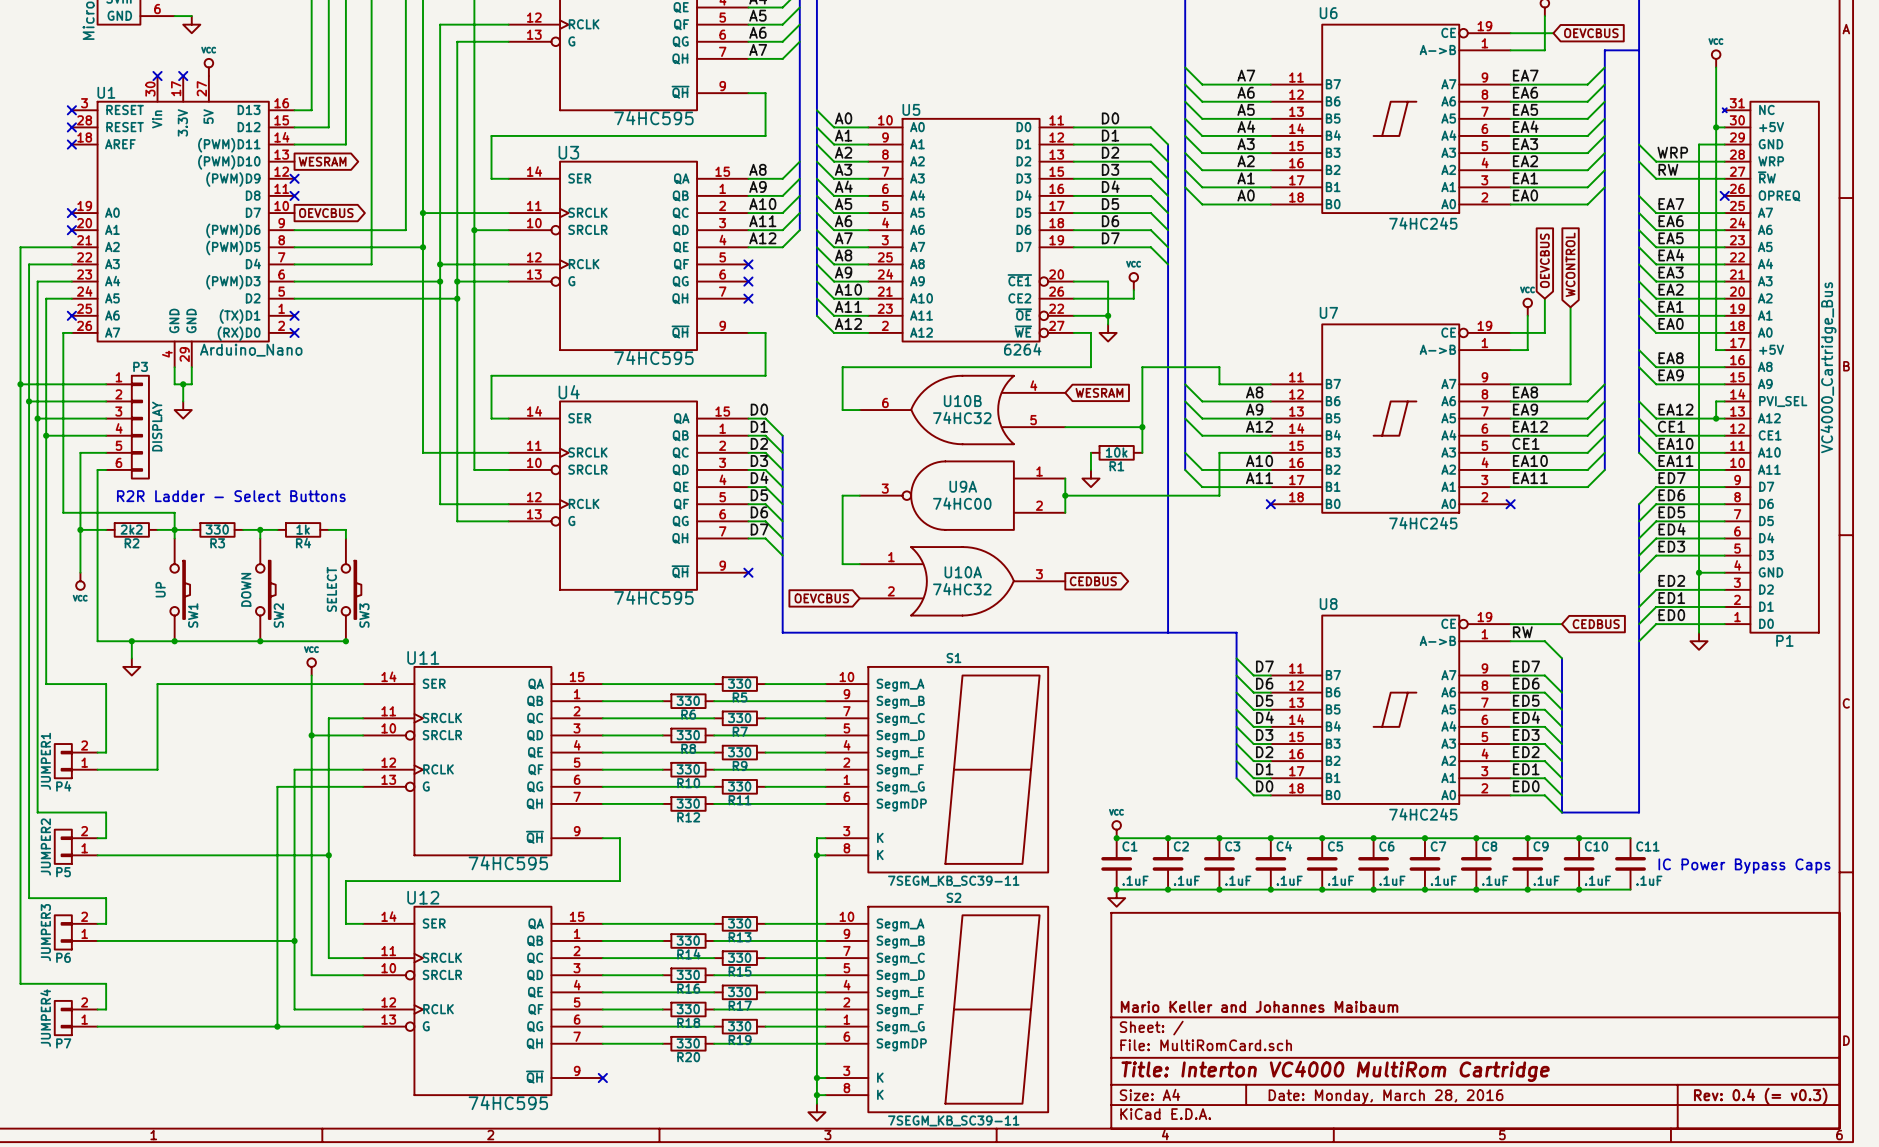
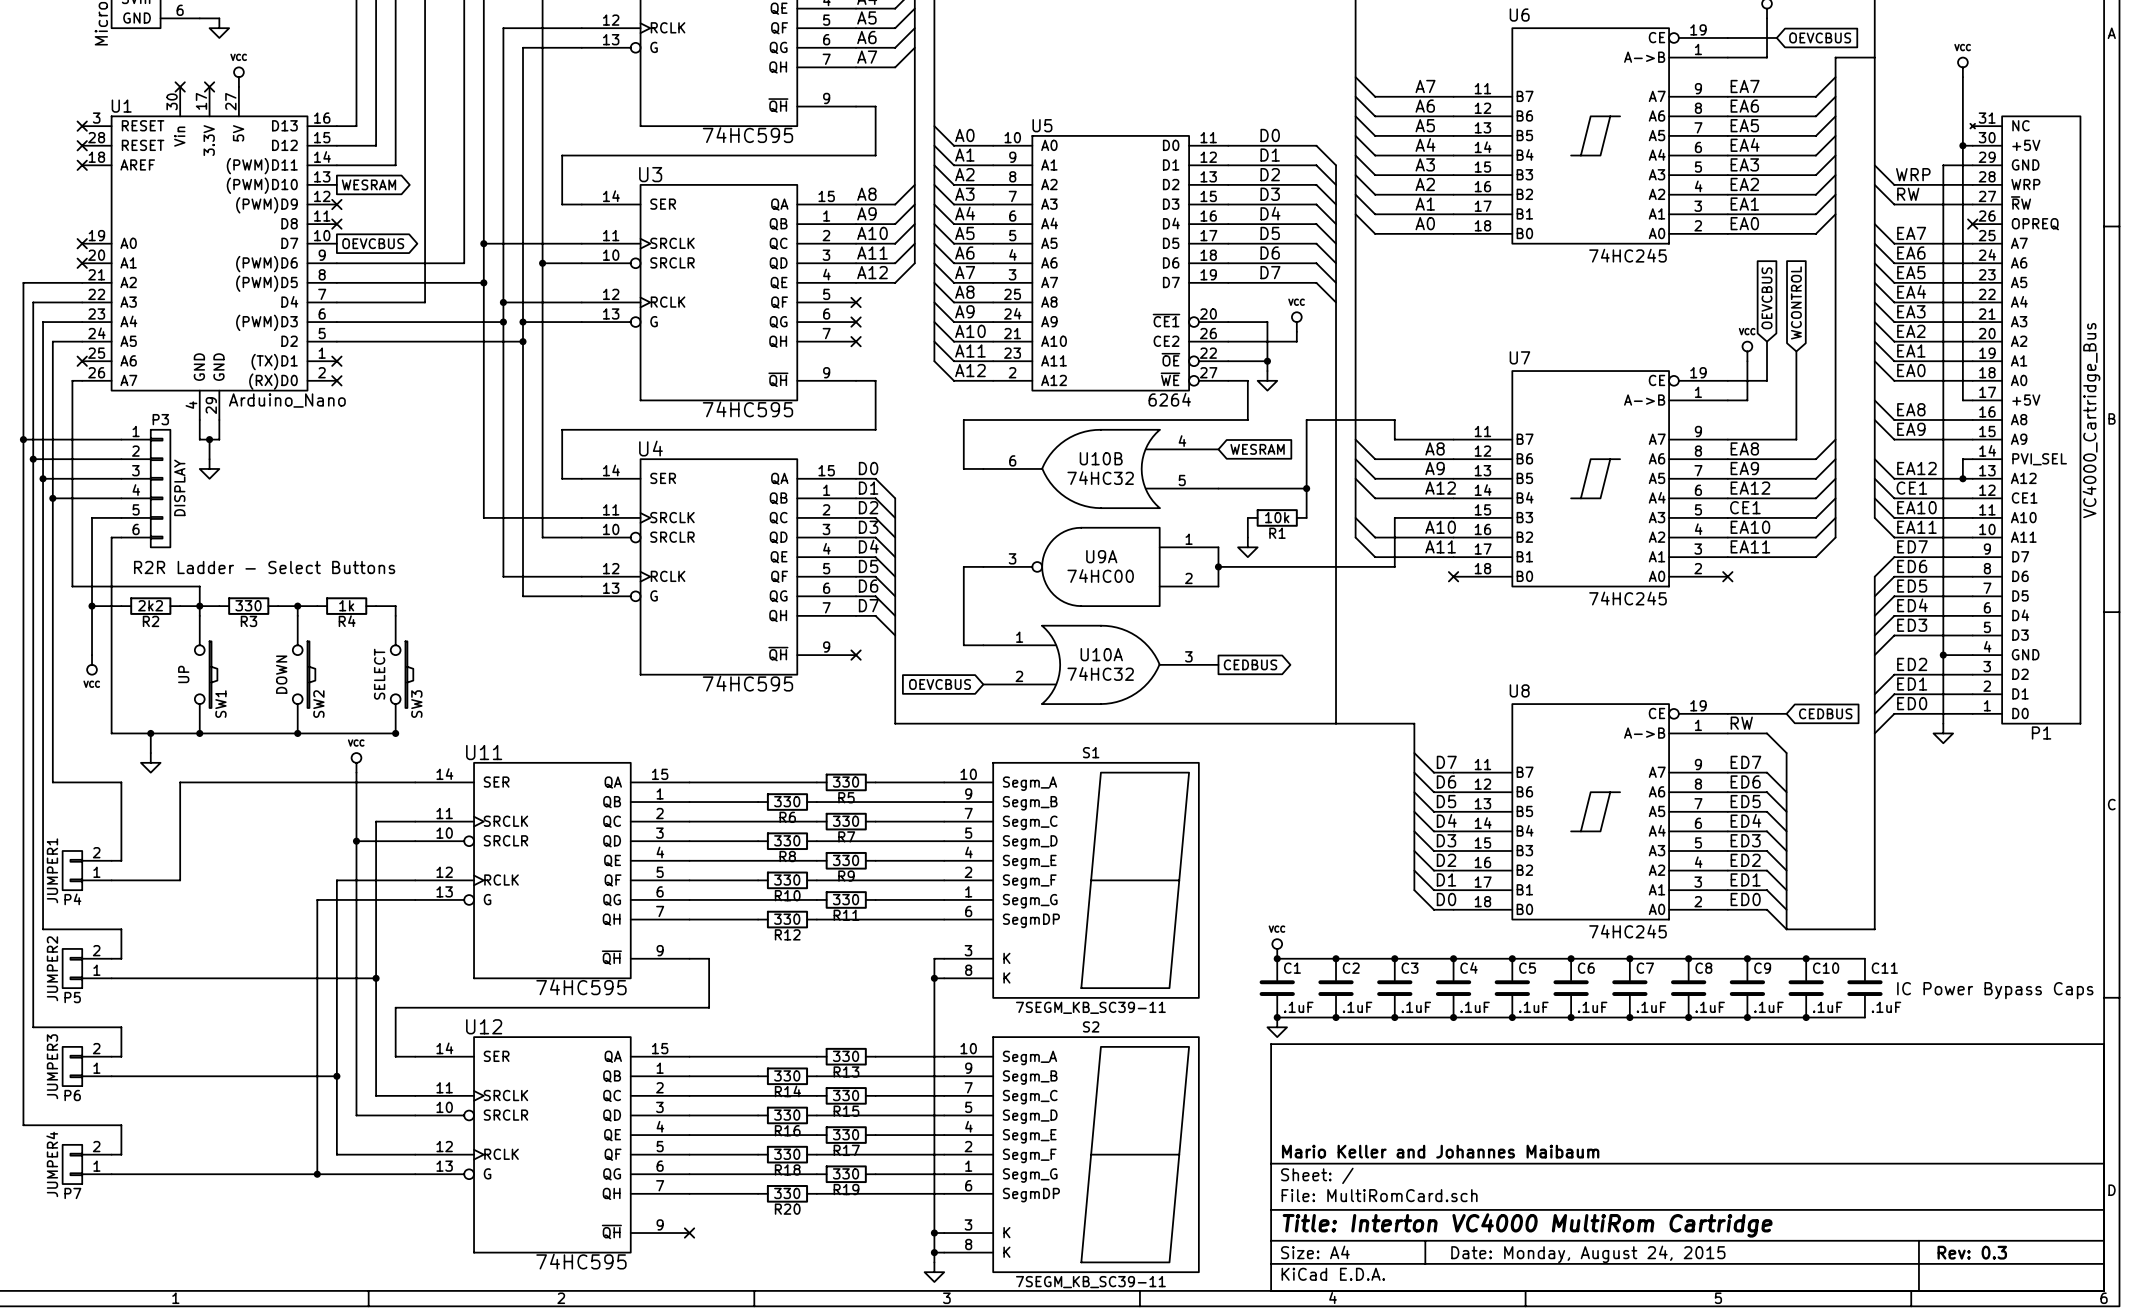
title block: Date: Monday, March 28, 2016 (1386, 1096) -> Date: Monday, August 24, 2015 (1588, 1254)
title block: Rev: 0.4 (= v0.3) (1760, 1096) -> Rev: 0.3 (1972, 1252)

